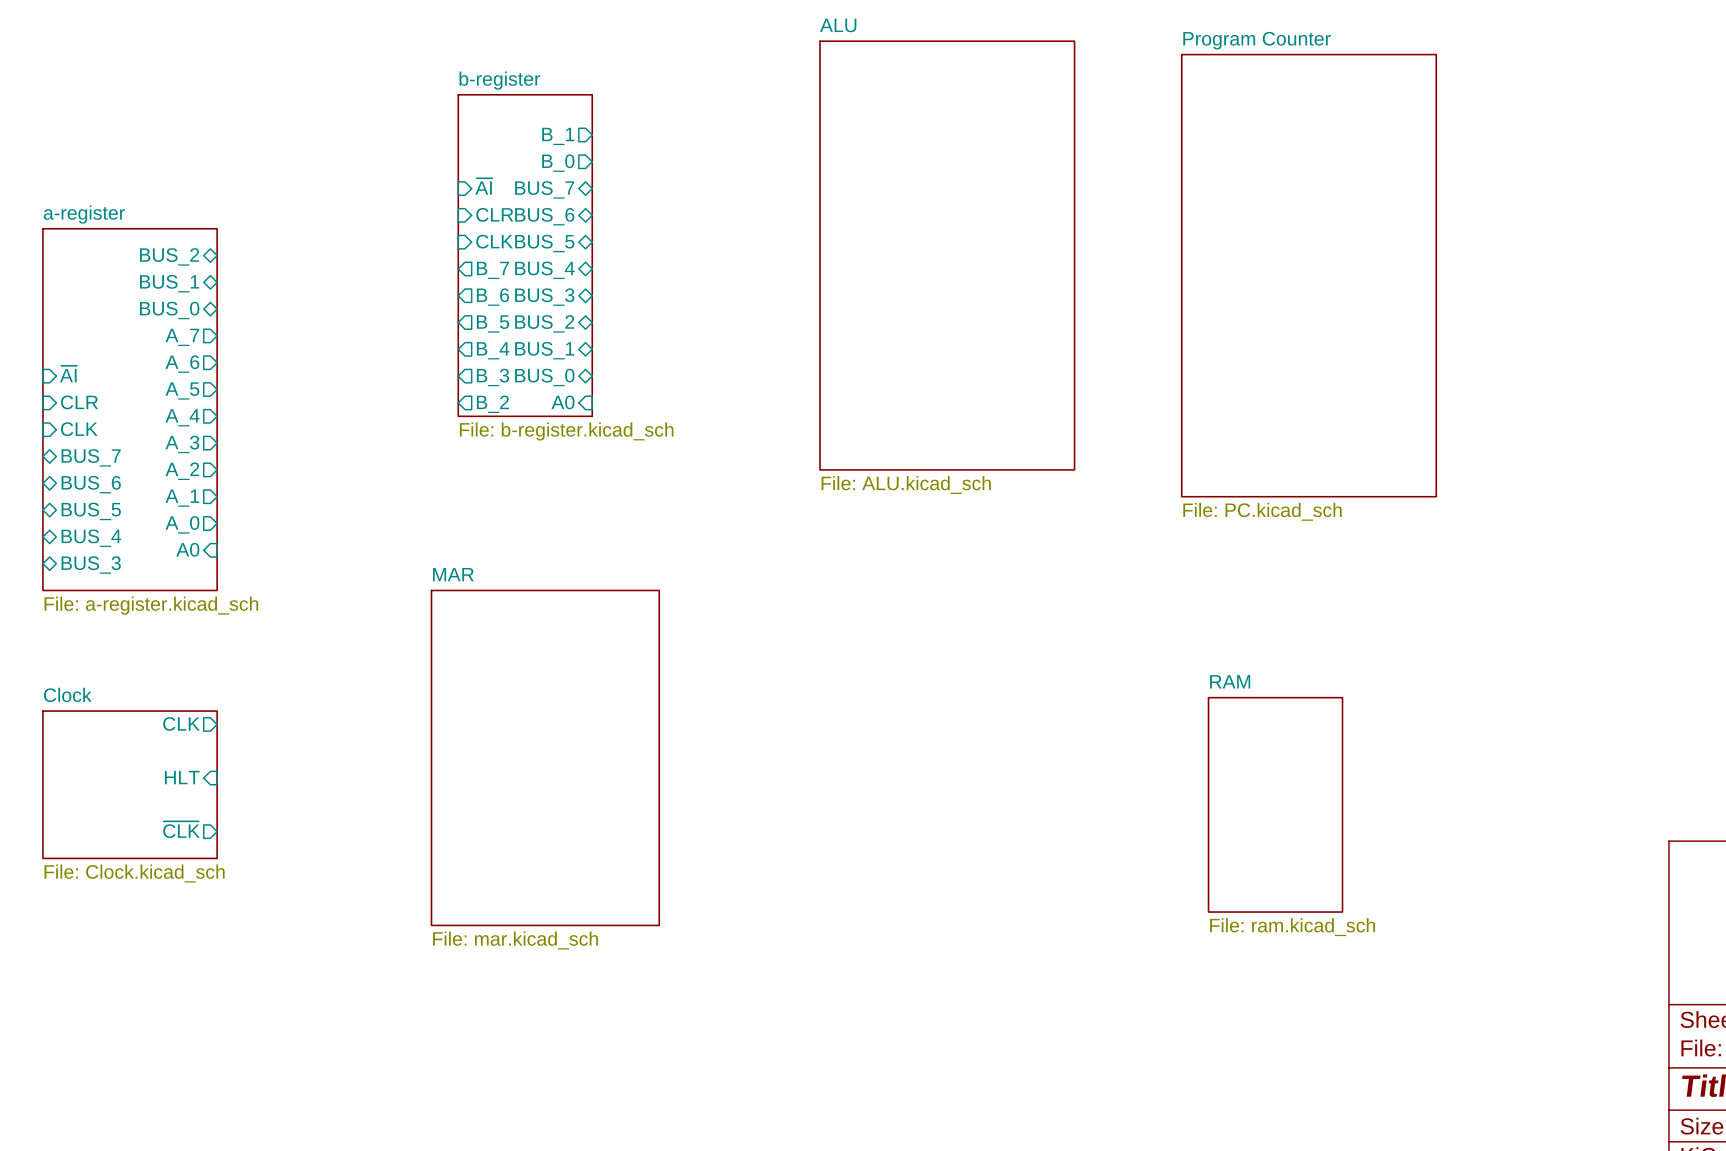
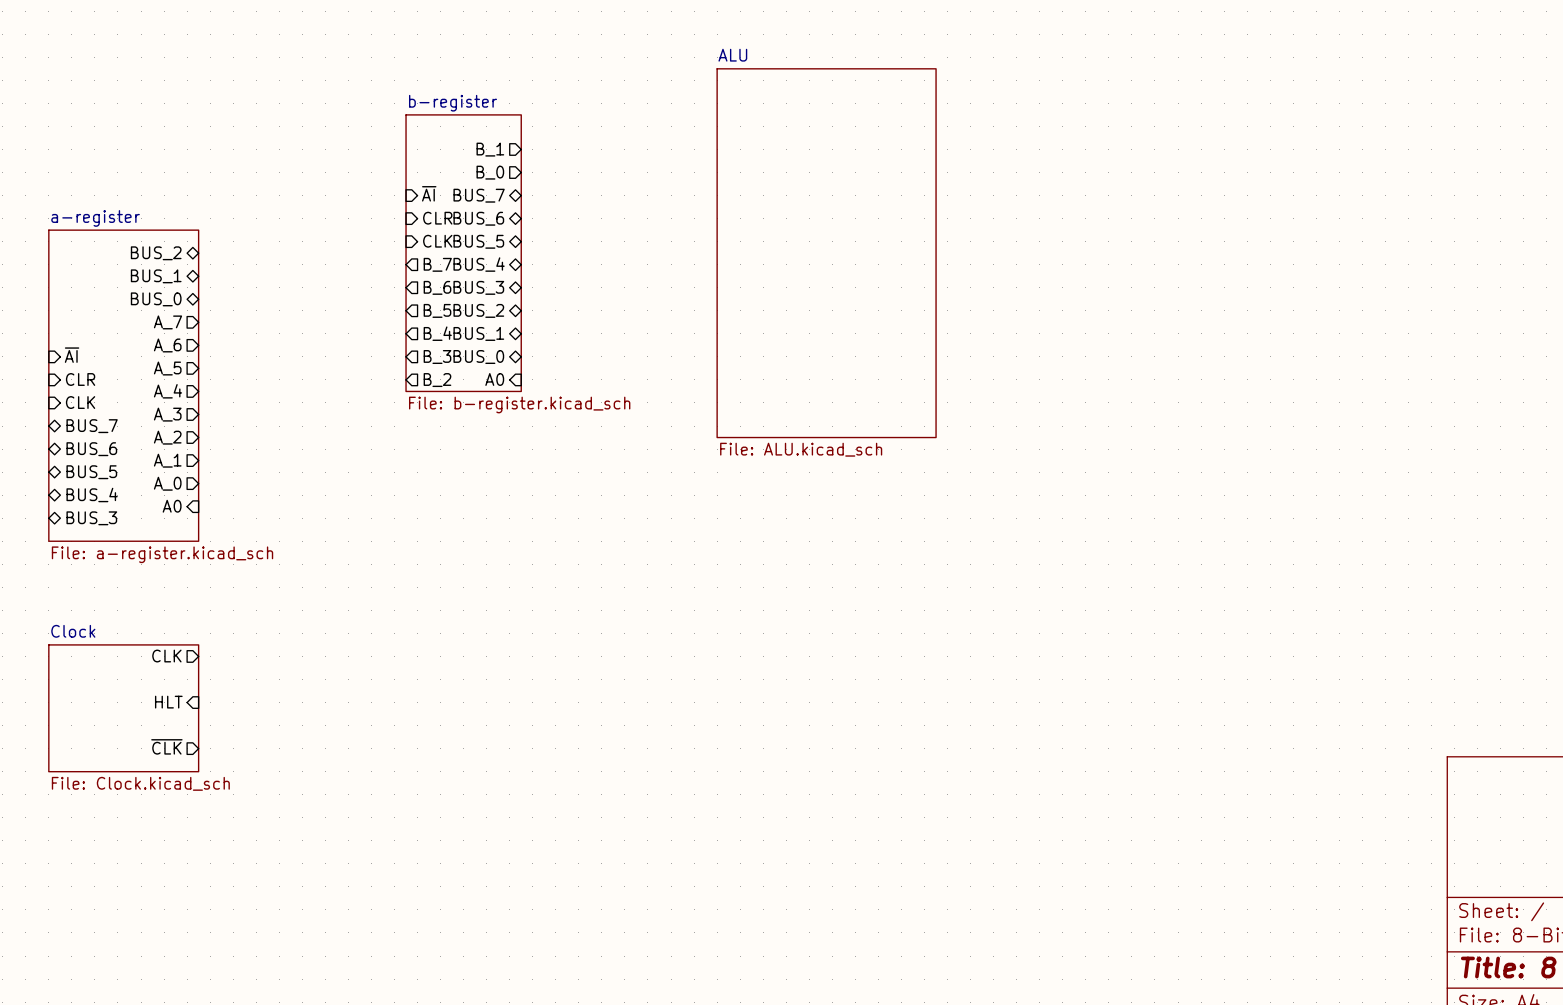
sheet Program Counter: File: PC.kicad_sch (1309, 275) -> none
sheet MAR: File: mar.kicad_sch (545, 757) -> none
sheet RAM: File: ram.kicad_sch (1275, 804) -> none

